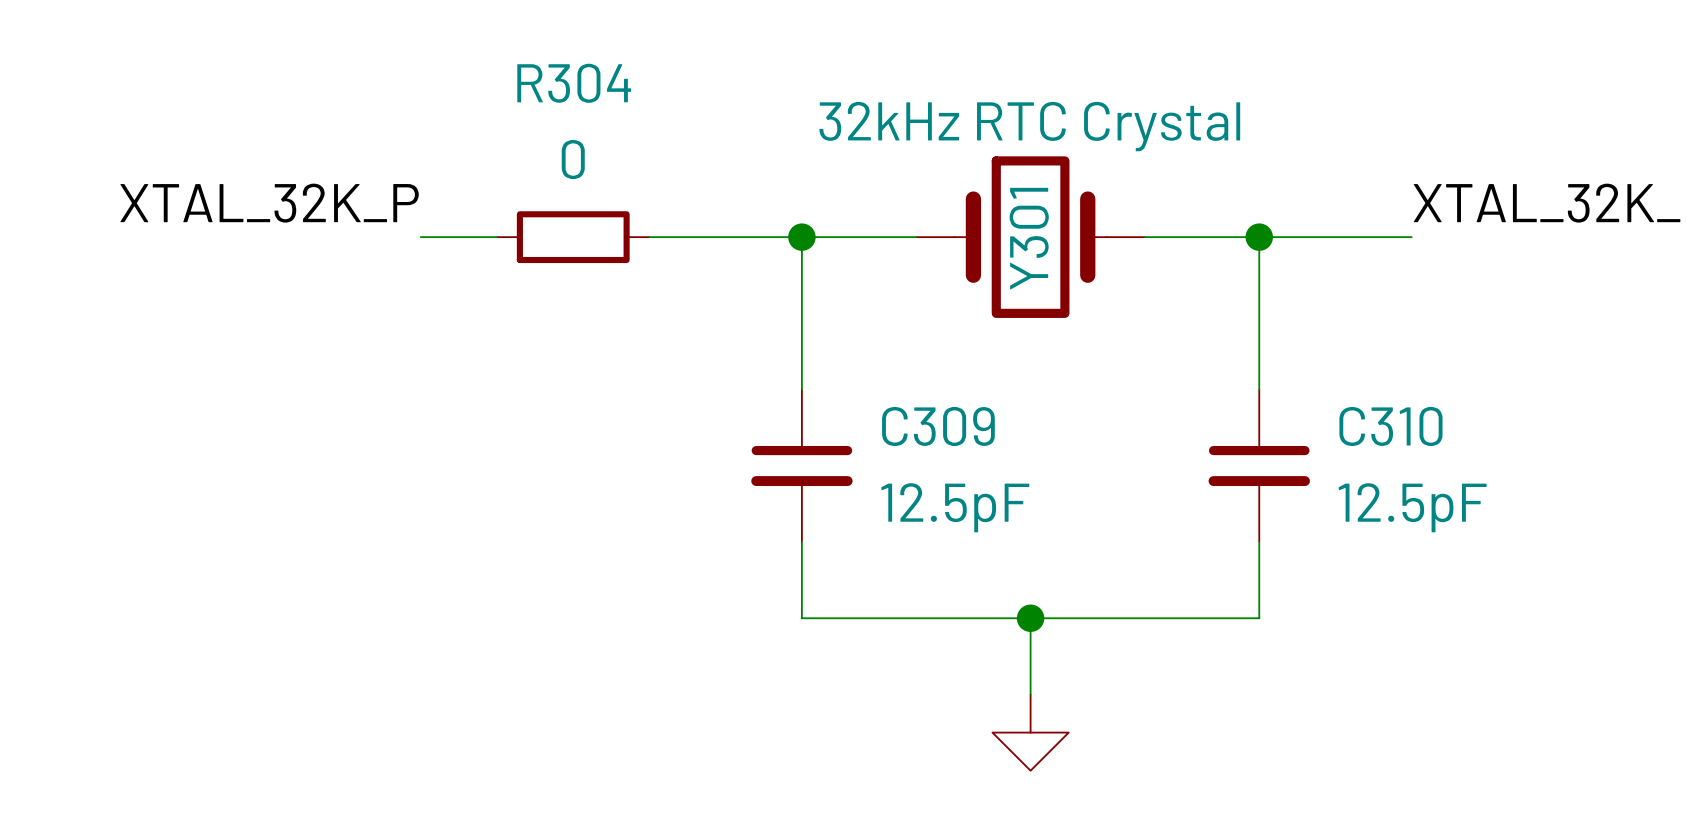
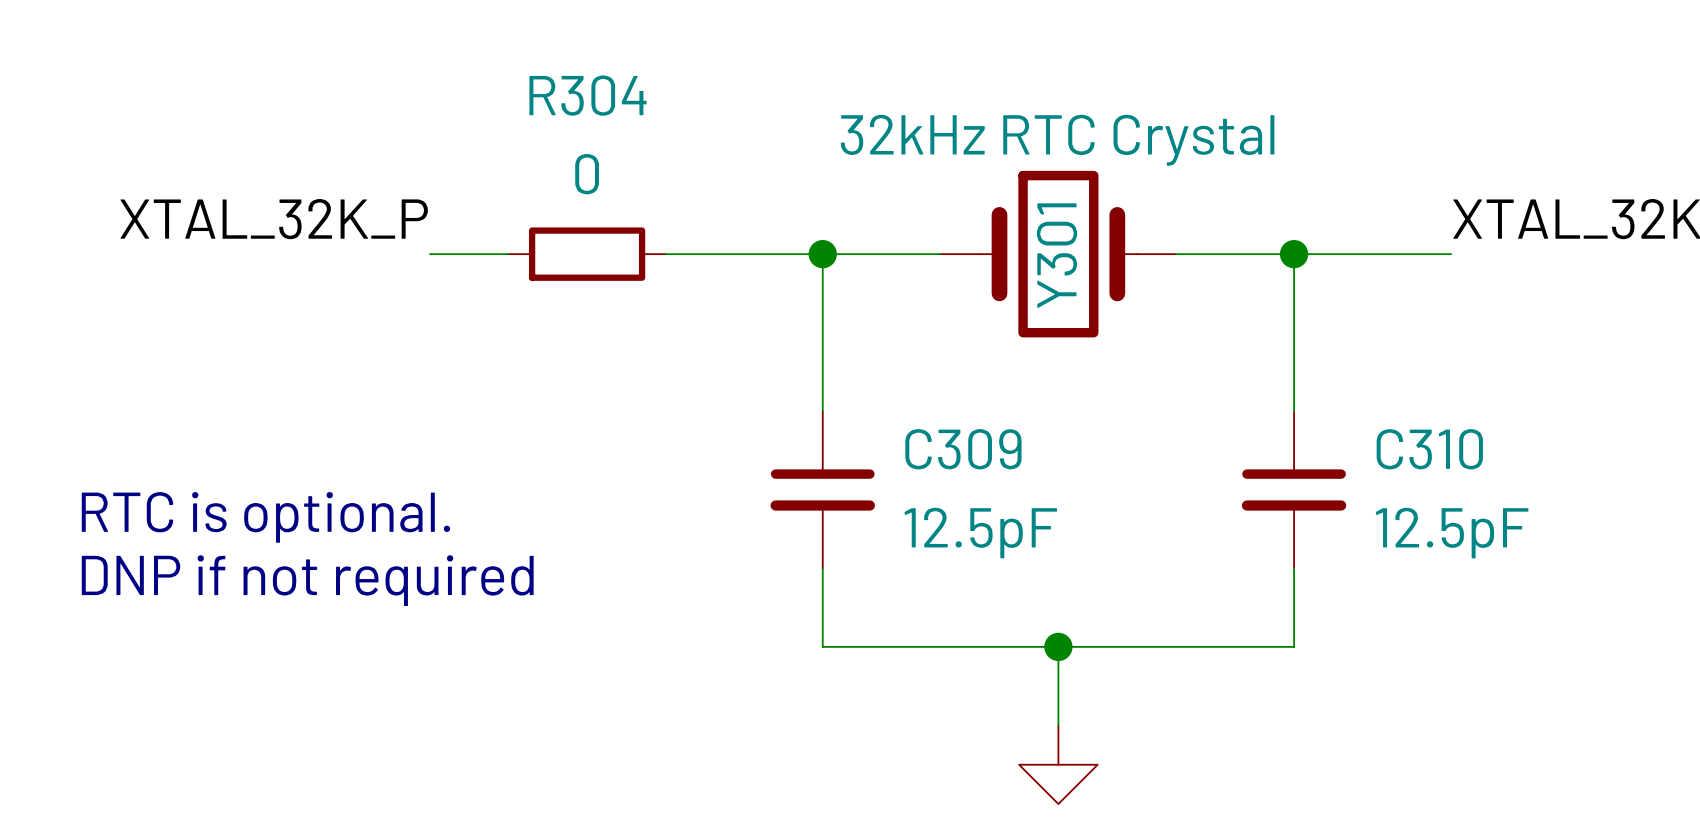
text: none -> RTC is optional. (265, 517)
text: none -> DNP if not required (307, 580)

